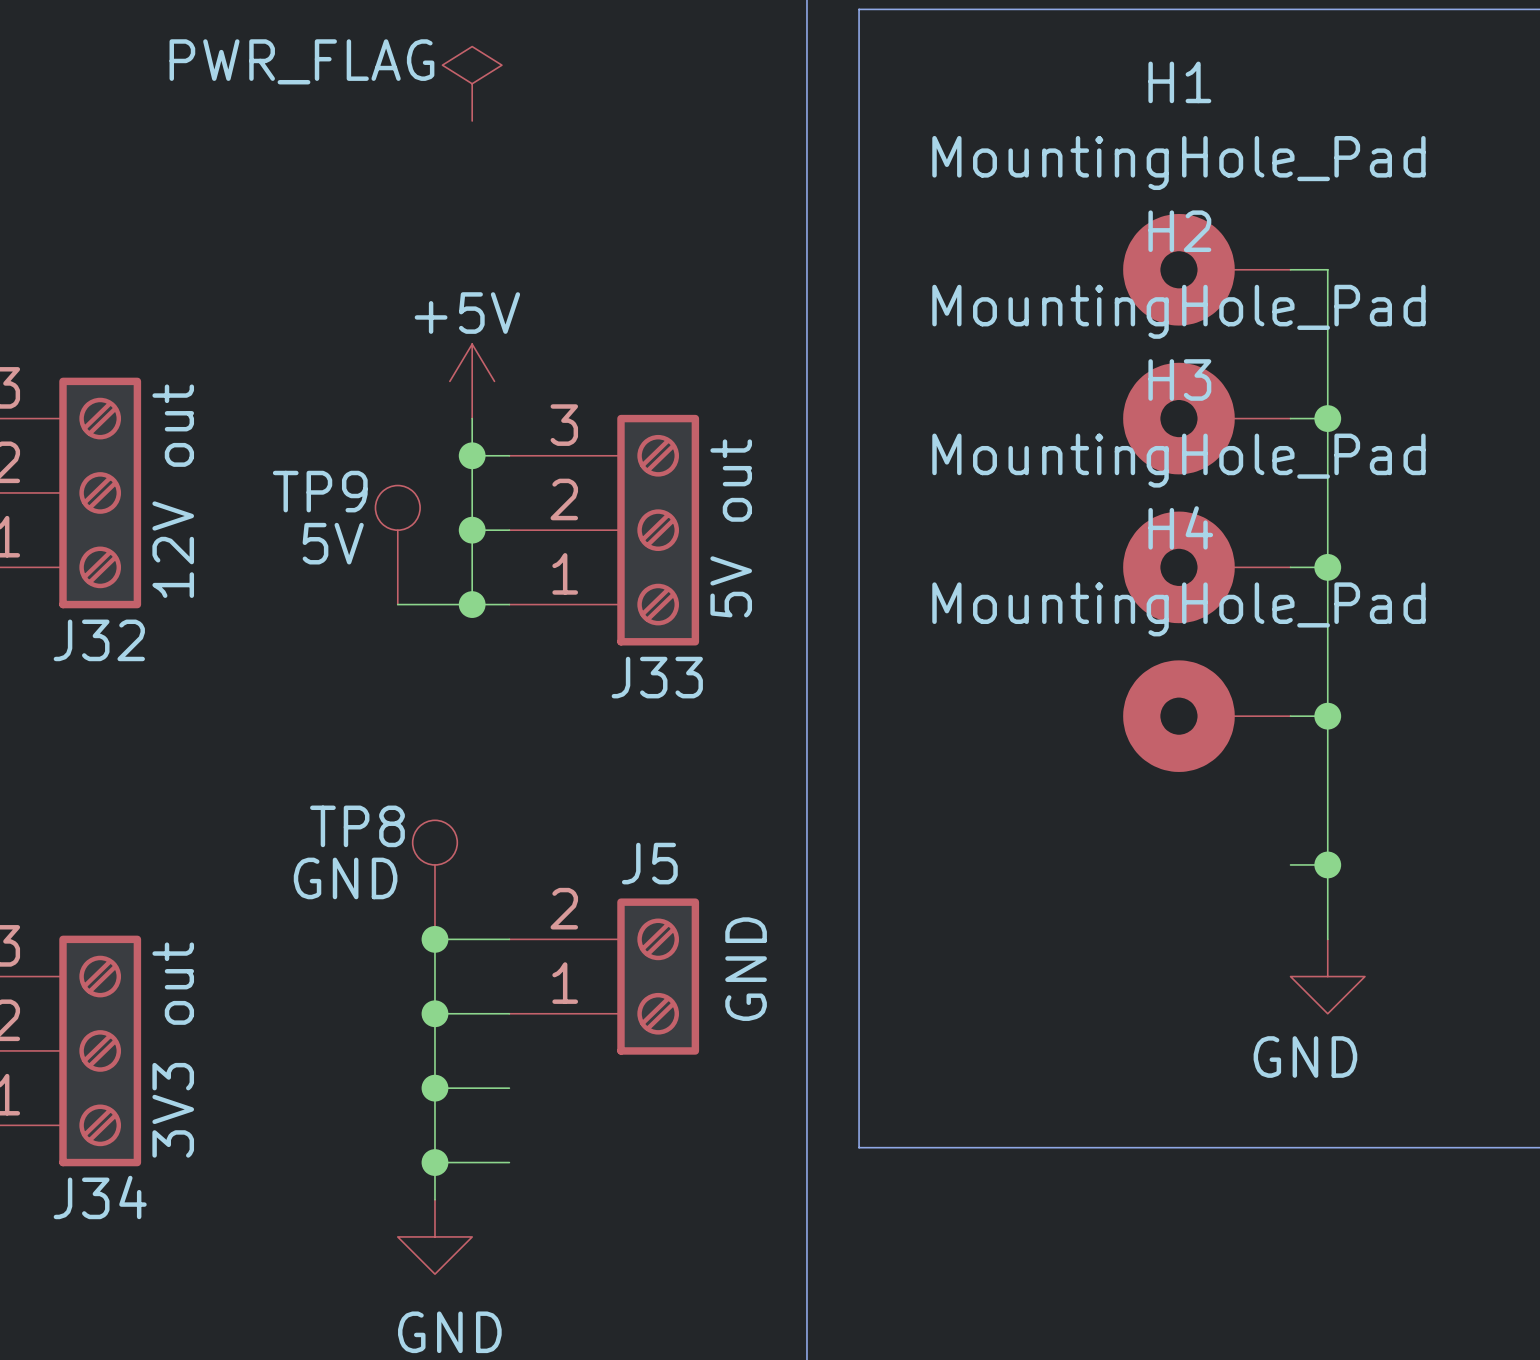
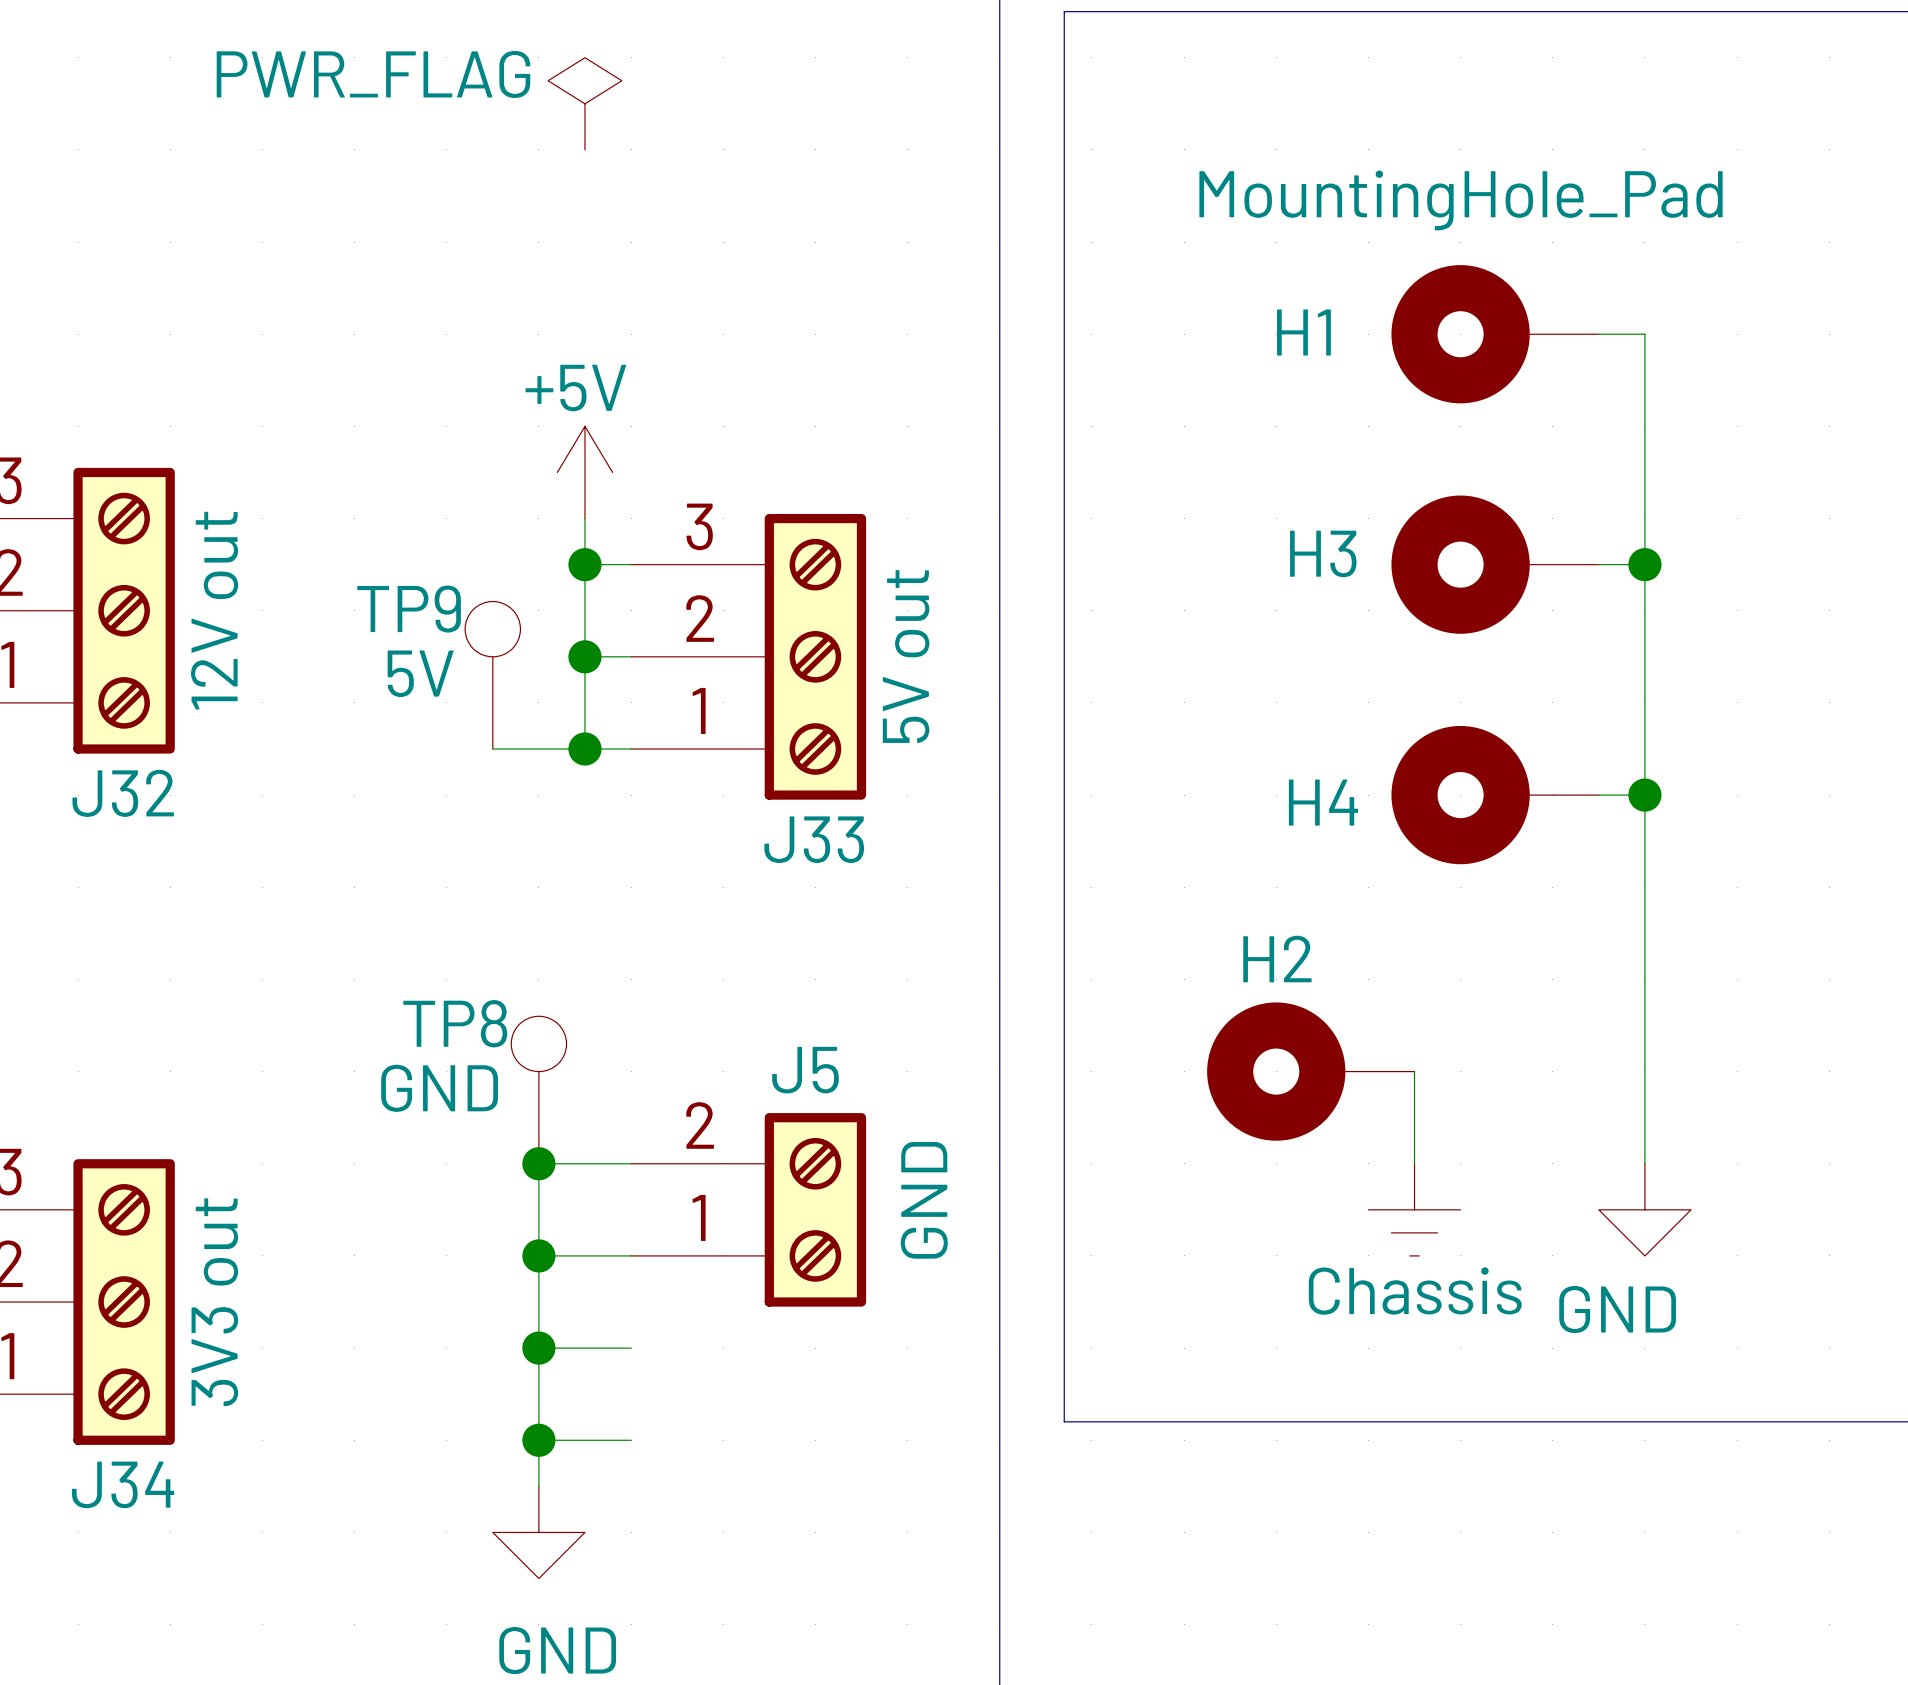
H1 name position: H1 (1179, 82) -> H1 (1303, 332)
H2 name position: H2 (1179, 231) -> H2 (1277, 959)
H2 value: MountingHole_Pad (1178, 311) -> none
H3 name position: H3 (1179, 379) -> H3 (1323, 553)
H2 position: (1206, 418) -> (1310, 1071)
wire: (1290, 418) (1327, 418) -> (1598, 564) (1644, 564)
junction position: (1327, 418) -> (1644, 564)
H3 value: MountingHole_Pad (1178, 460) -> none
H4 name position: H4 (1180, 527) -> H4 (1323, 802)
H3 position: (1206, 567) -> (1495, 564)
wire: (1290, 567) (1327, 567) -> (1598, 795) (1644, 795)
junction: (1327, 567) -> none
H4 value: MountingHole_Pad (1178, 609) -> none
junction: none -> (1644, 795)
H4 position: (1206, 716) -> (1495, 795)
wire: (1290, 716) (1327, 716) -> none
junction: (1327, 716) -> none
wire: none -> (1414, 1071) (1414, 1163)
wire: (1290, 864) (1327, 864) -> none
junction: (1327, 864) -> none
power symbol: none -> Chassis (1414, 1209)

